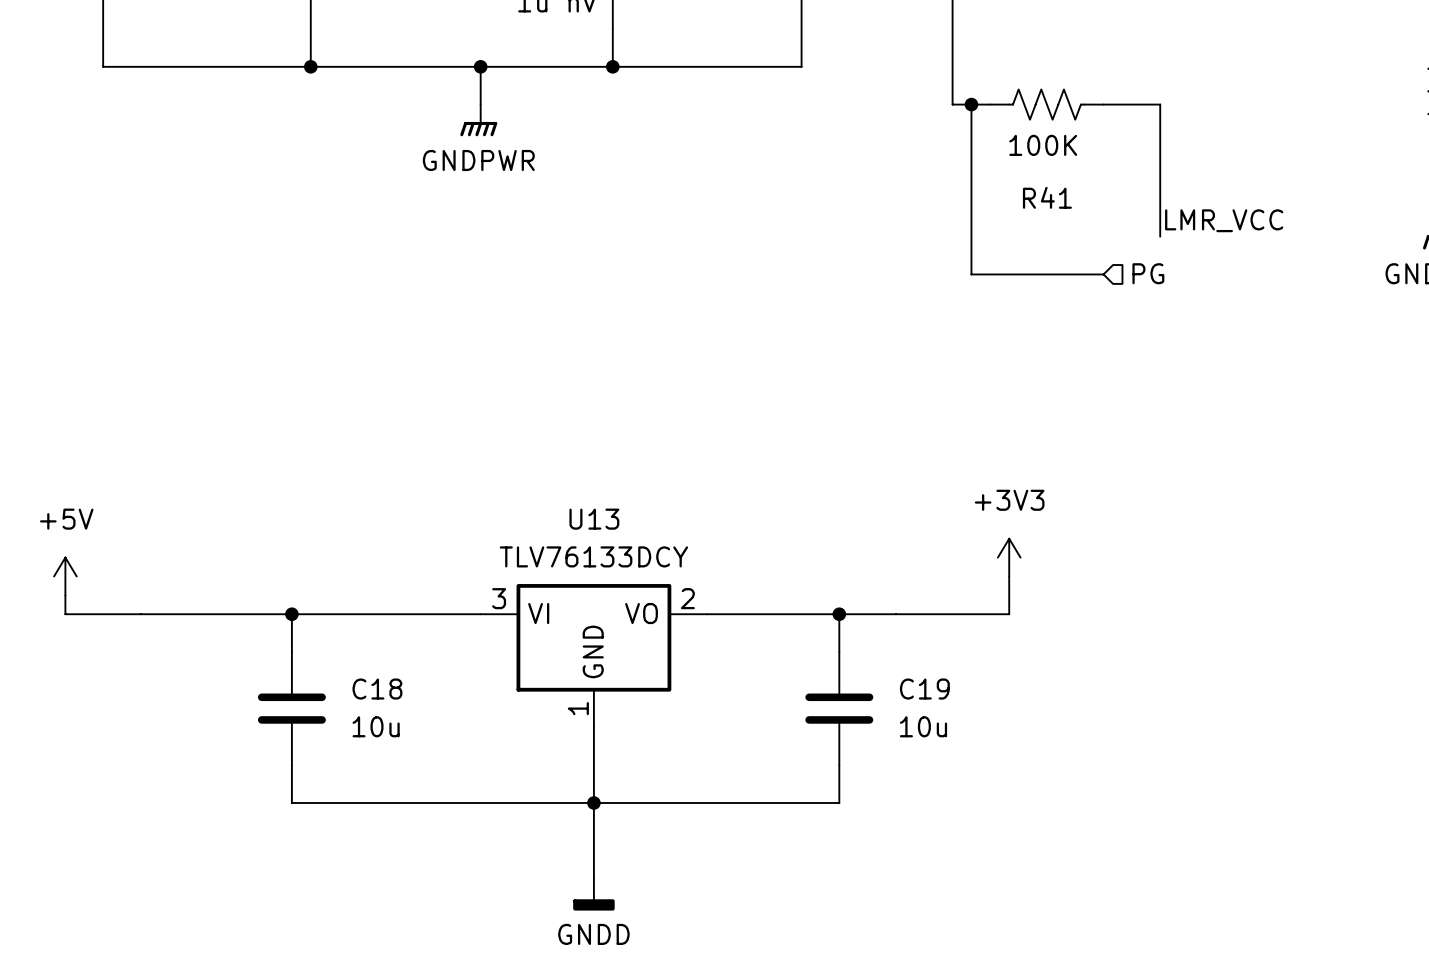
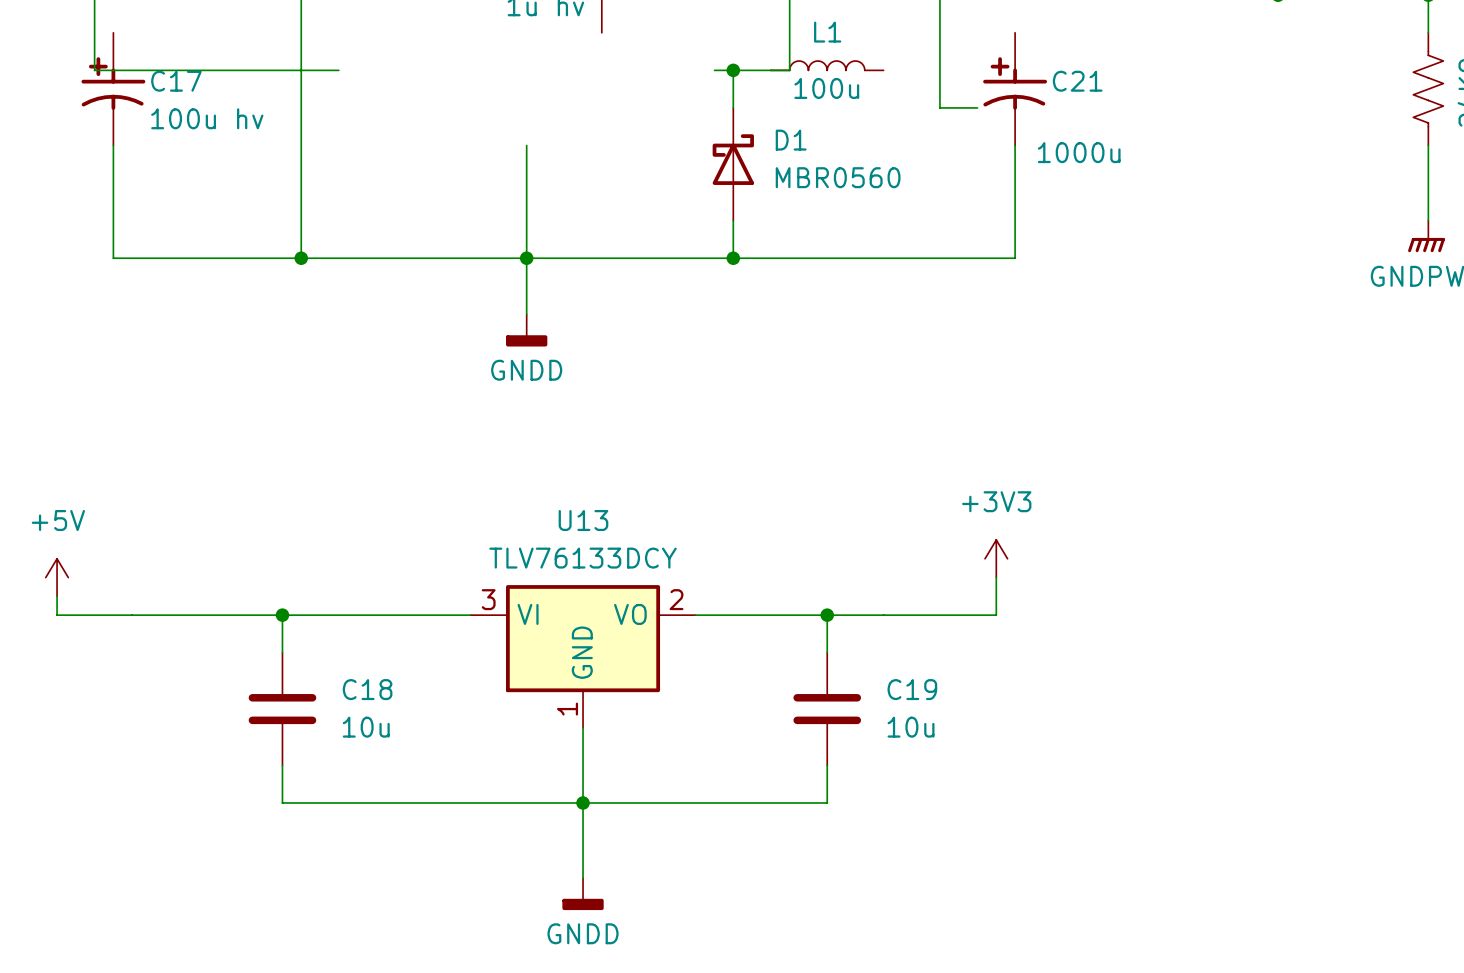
wire: (612, 29) (612, 66) -> (733, 70) (733, 107)
L1: none -> 100u (827, 65)
wire: none -> (301, 70) (301, 258)
junction: (310, 66) -> none
wire: (348, 66) (726, 66) -> none
wire: (480, 66) (480, 104) -> (733, 220) (733, 258)
junction: (480, 66) -> none
junction: (612, 66) -> none
junction: none -> (733, 70)
C17: none -> 100u hv (113, 89)
C21: none -> 1000u (1015, 89)
wire: (971, 104) (971, 274) (1103, 274) -> none
junction: (971, 104) -> none
R41: 100K (1046, 104) -> none
wire: (1103, 104) (1160, 104) (1160, 236) -> none
power symbol: GNDPWR (478, 120) -> none
wire: none -> (113, 145) (113, 258) (1015, 258) (1015, 145)
wire: none -> (526, 145) (526, 314)
D1: none -> MBR0560 (733, 164)
label: LMR_VCC (1224, 220) -> none
junction: none -> (301, 258)
junction: none -> (526, 258)
junction: none -> (733, 258)
hierarchical label: PG (1148, 273) -> none
power symbol: none -> GNDD (526, 330)

